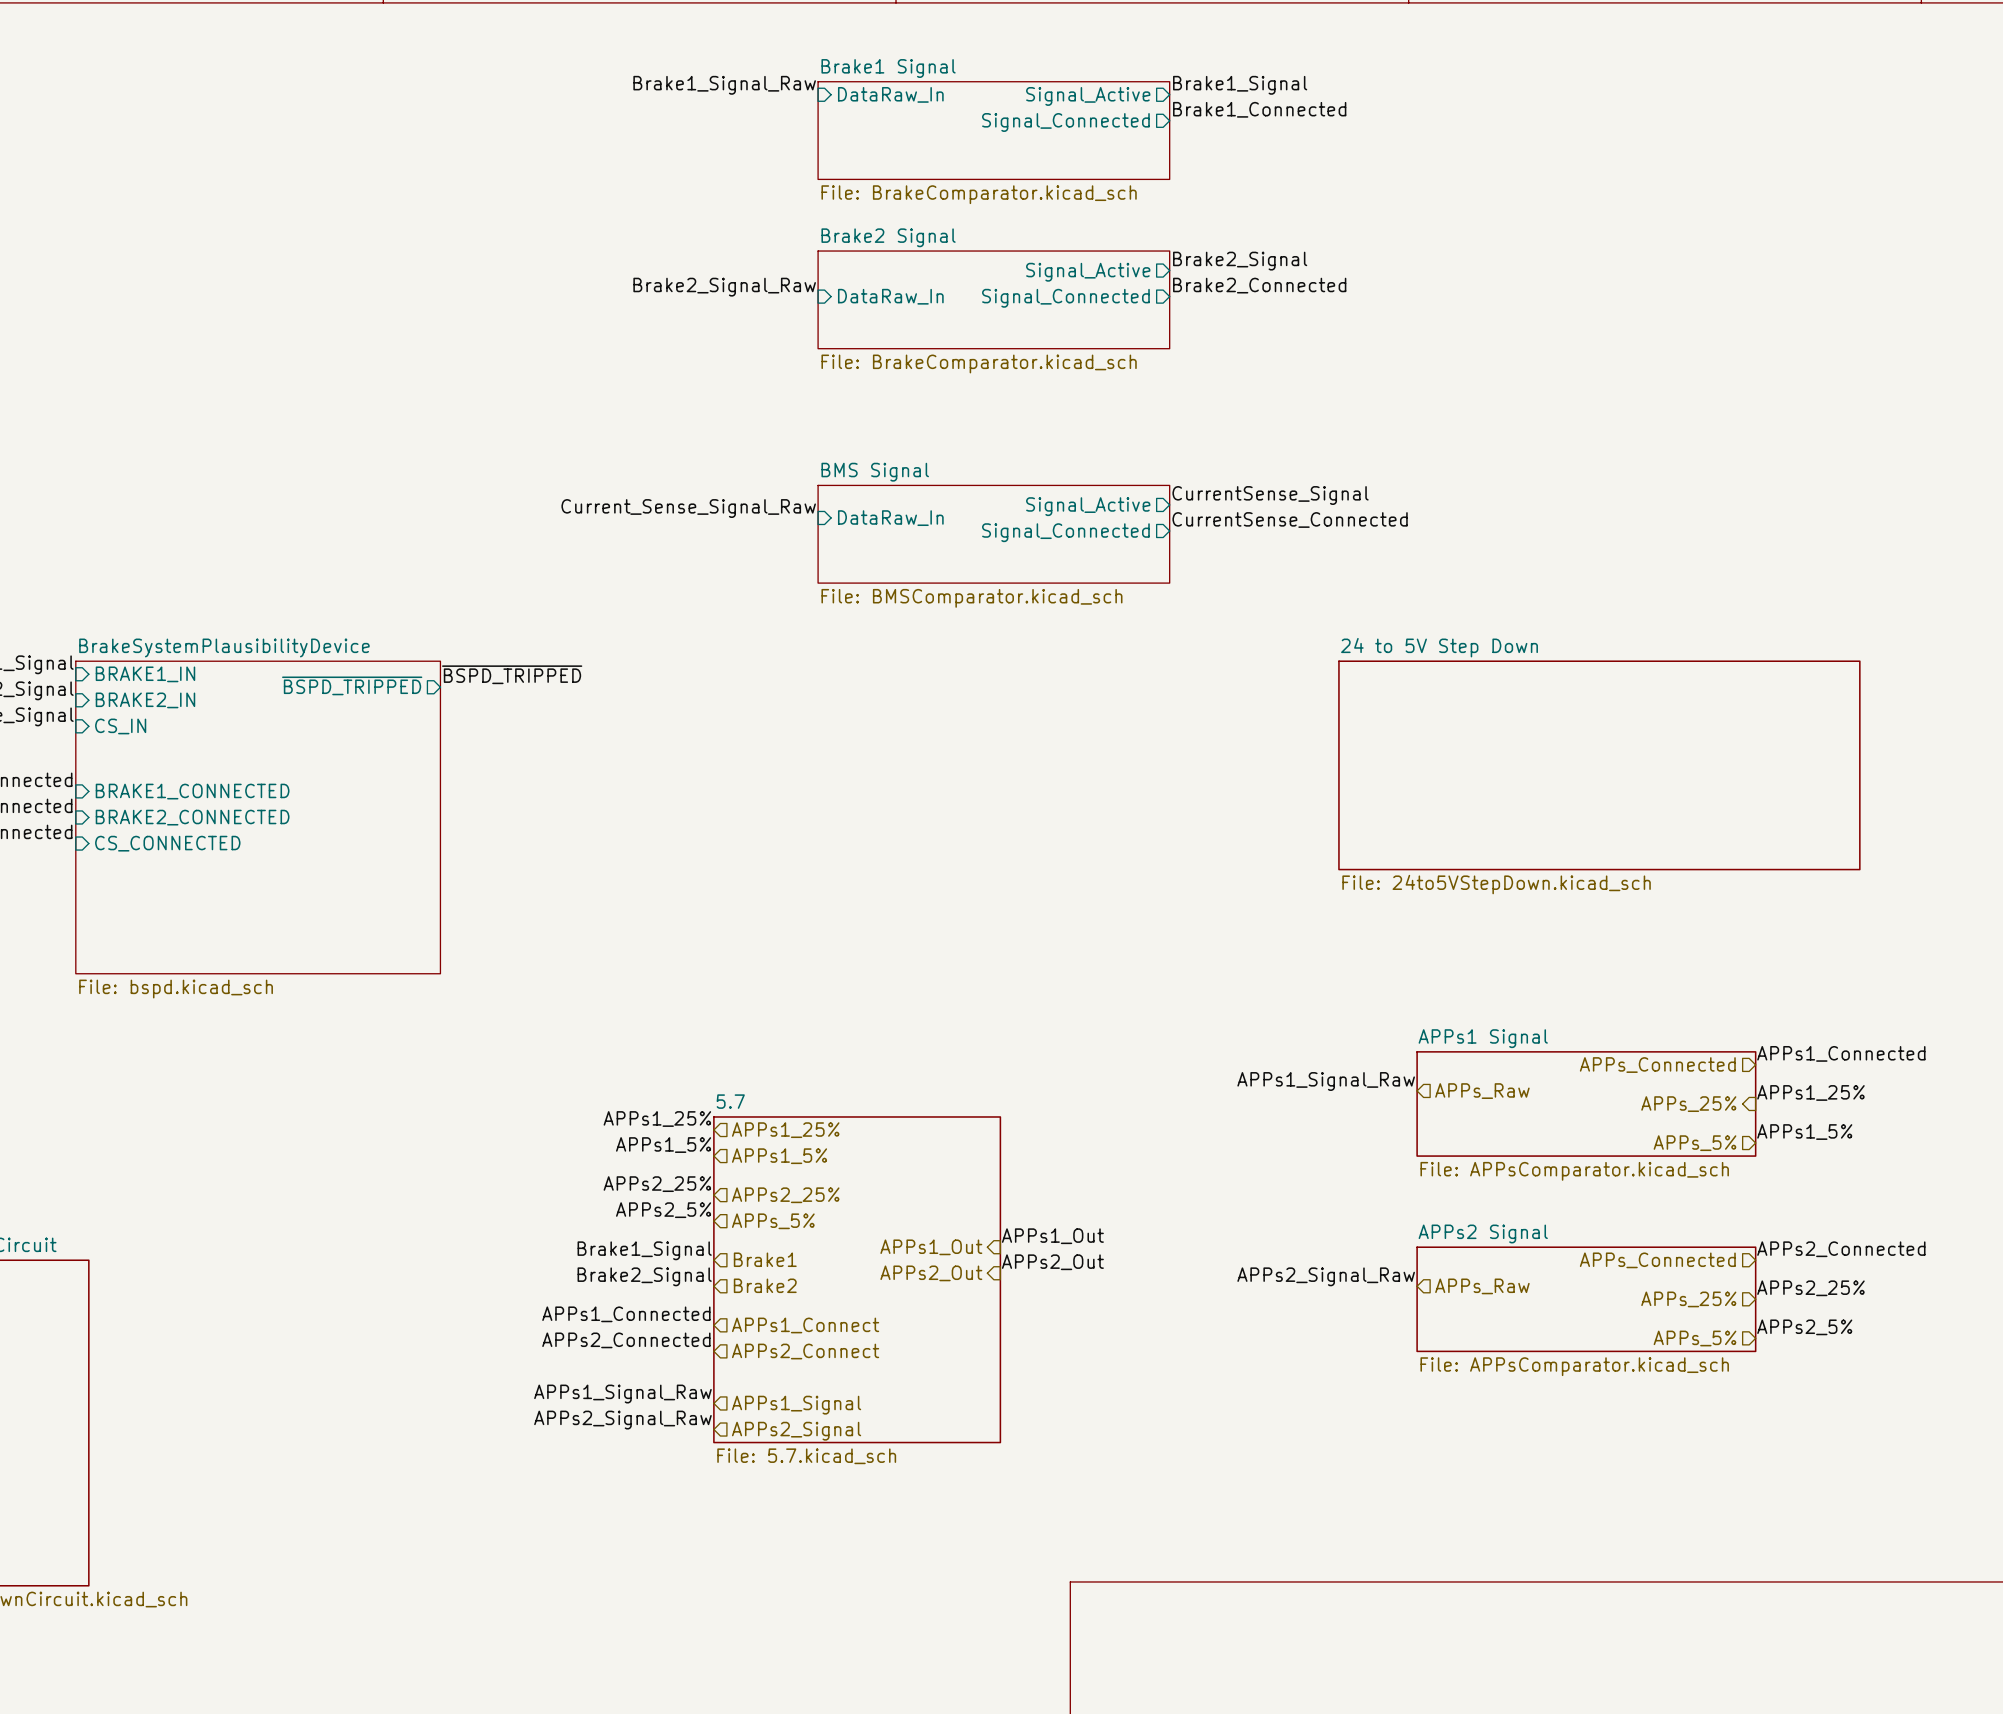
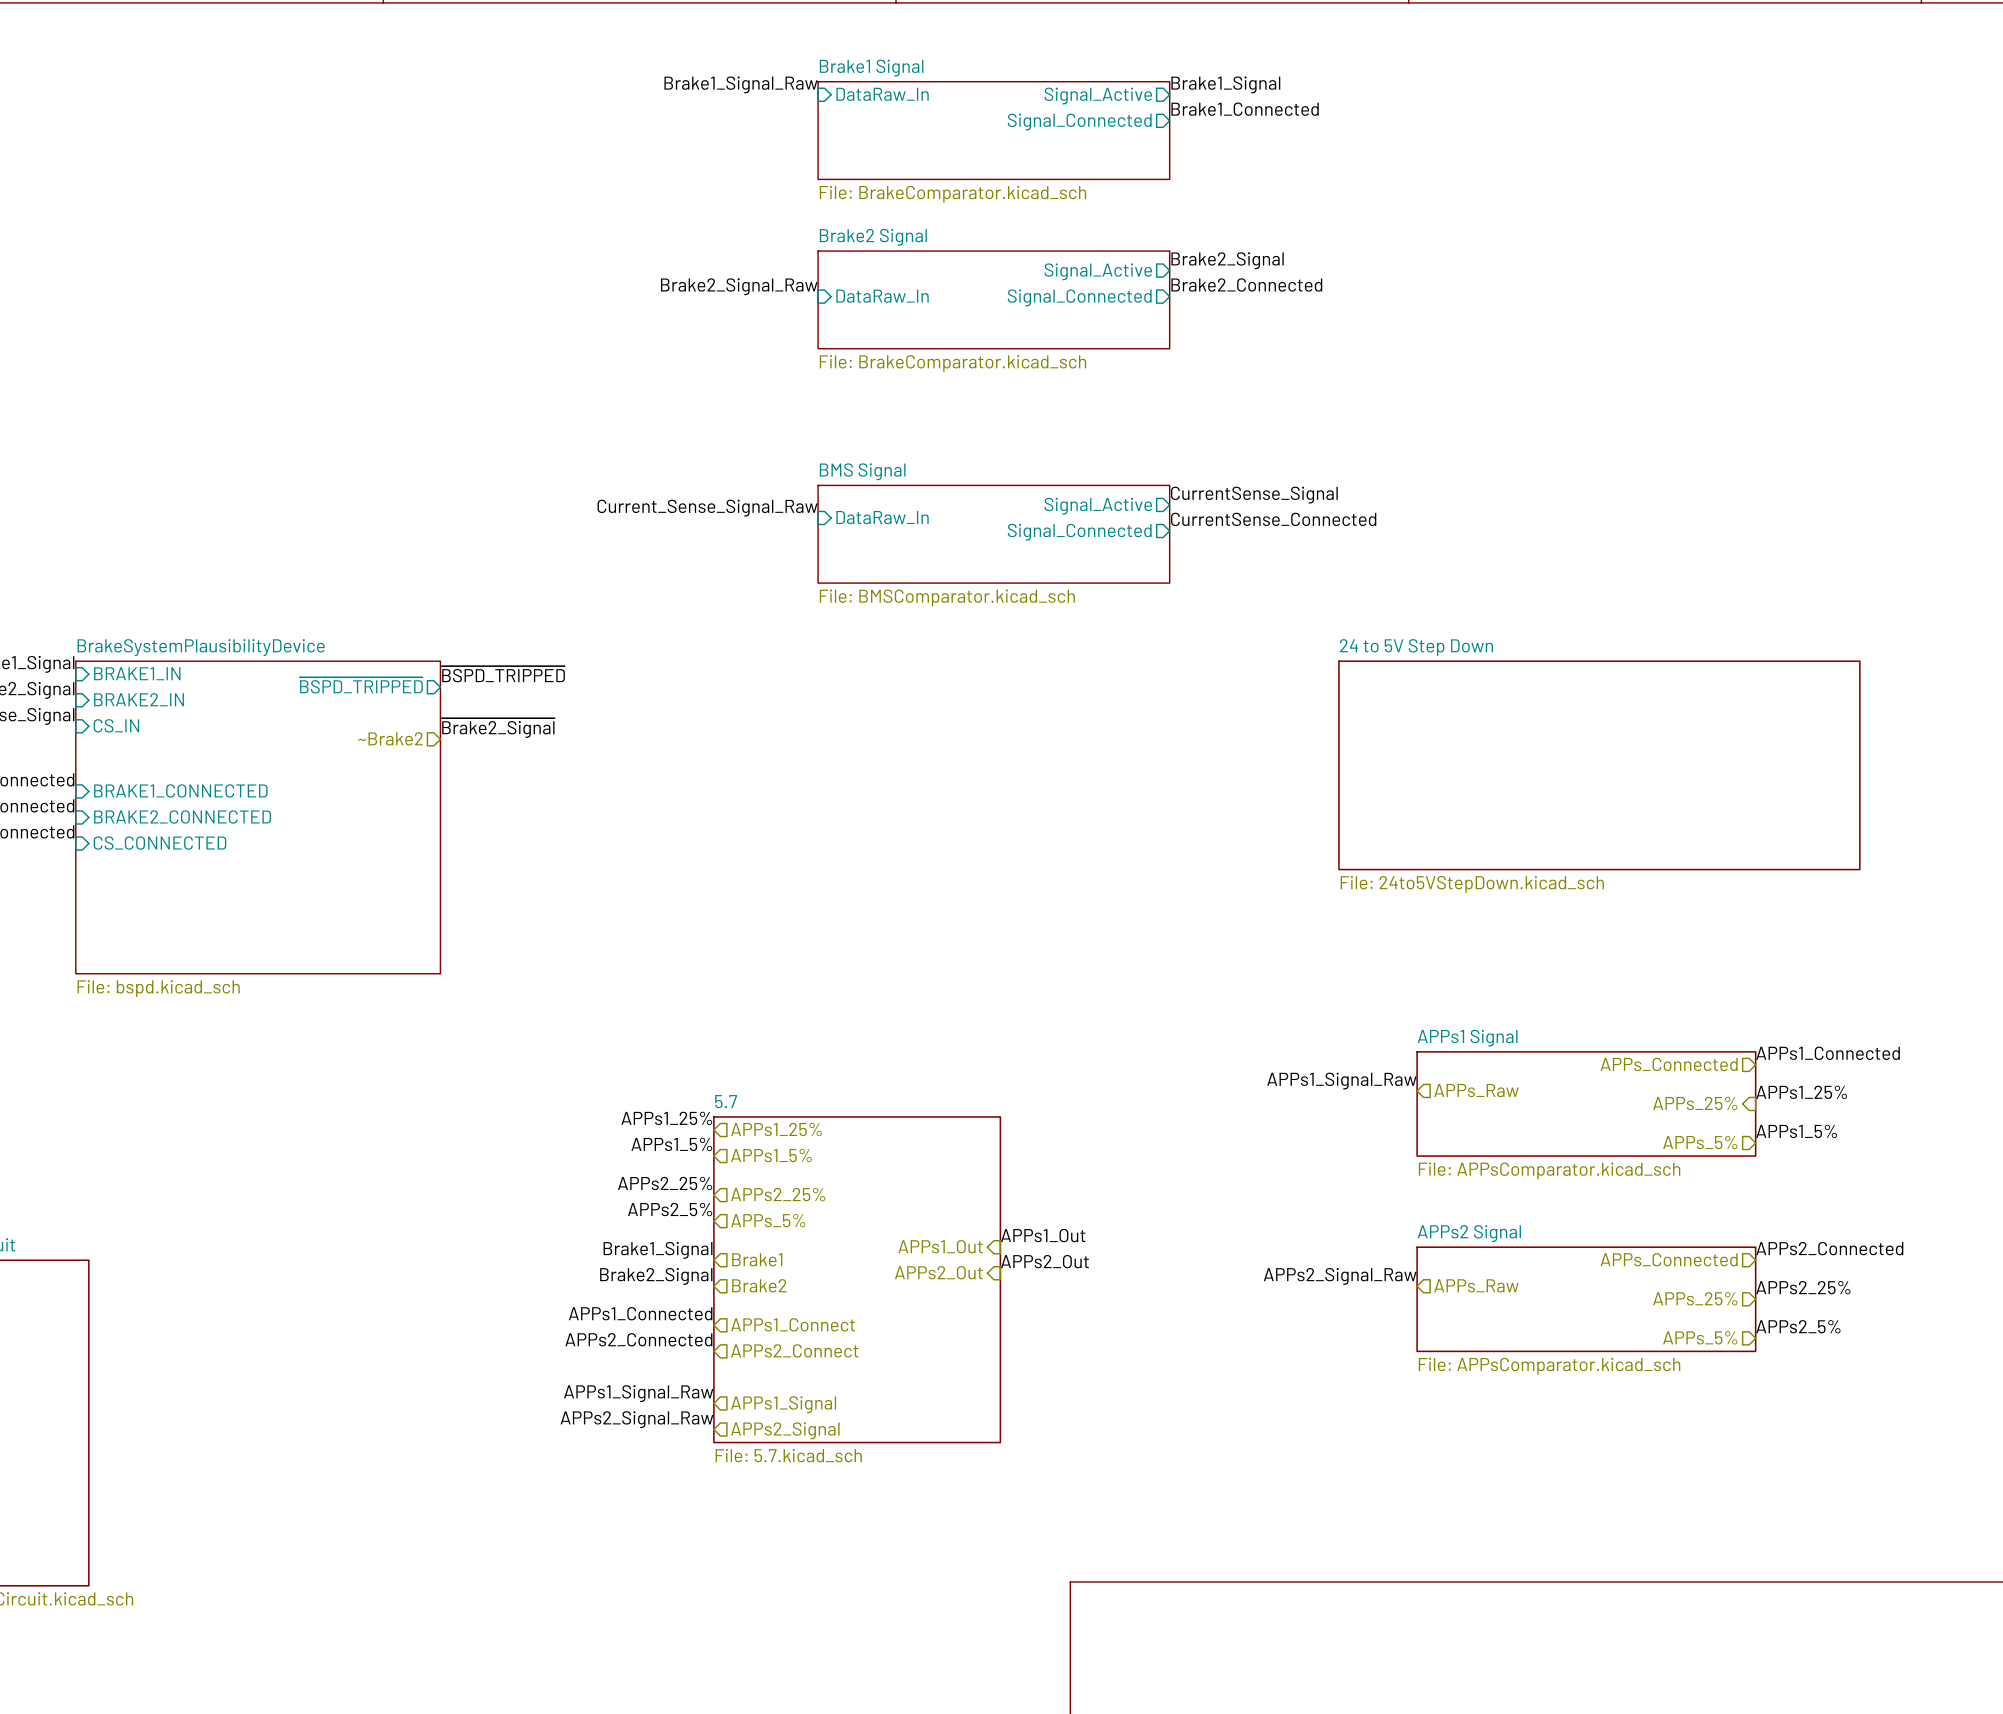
label: none -> ~{Brake2_Signal} (498, 728)
hierarchical label: none -> ~Brake2 (390, 738)

